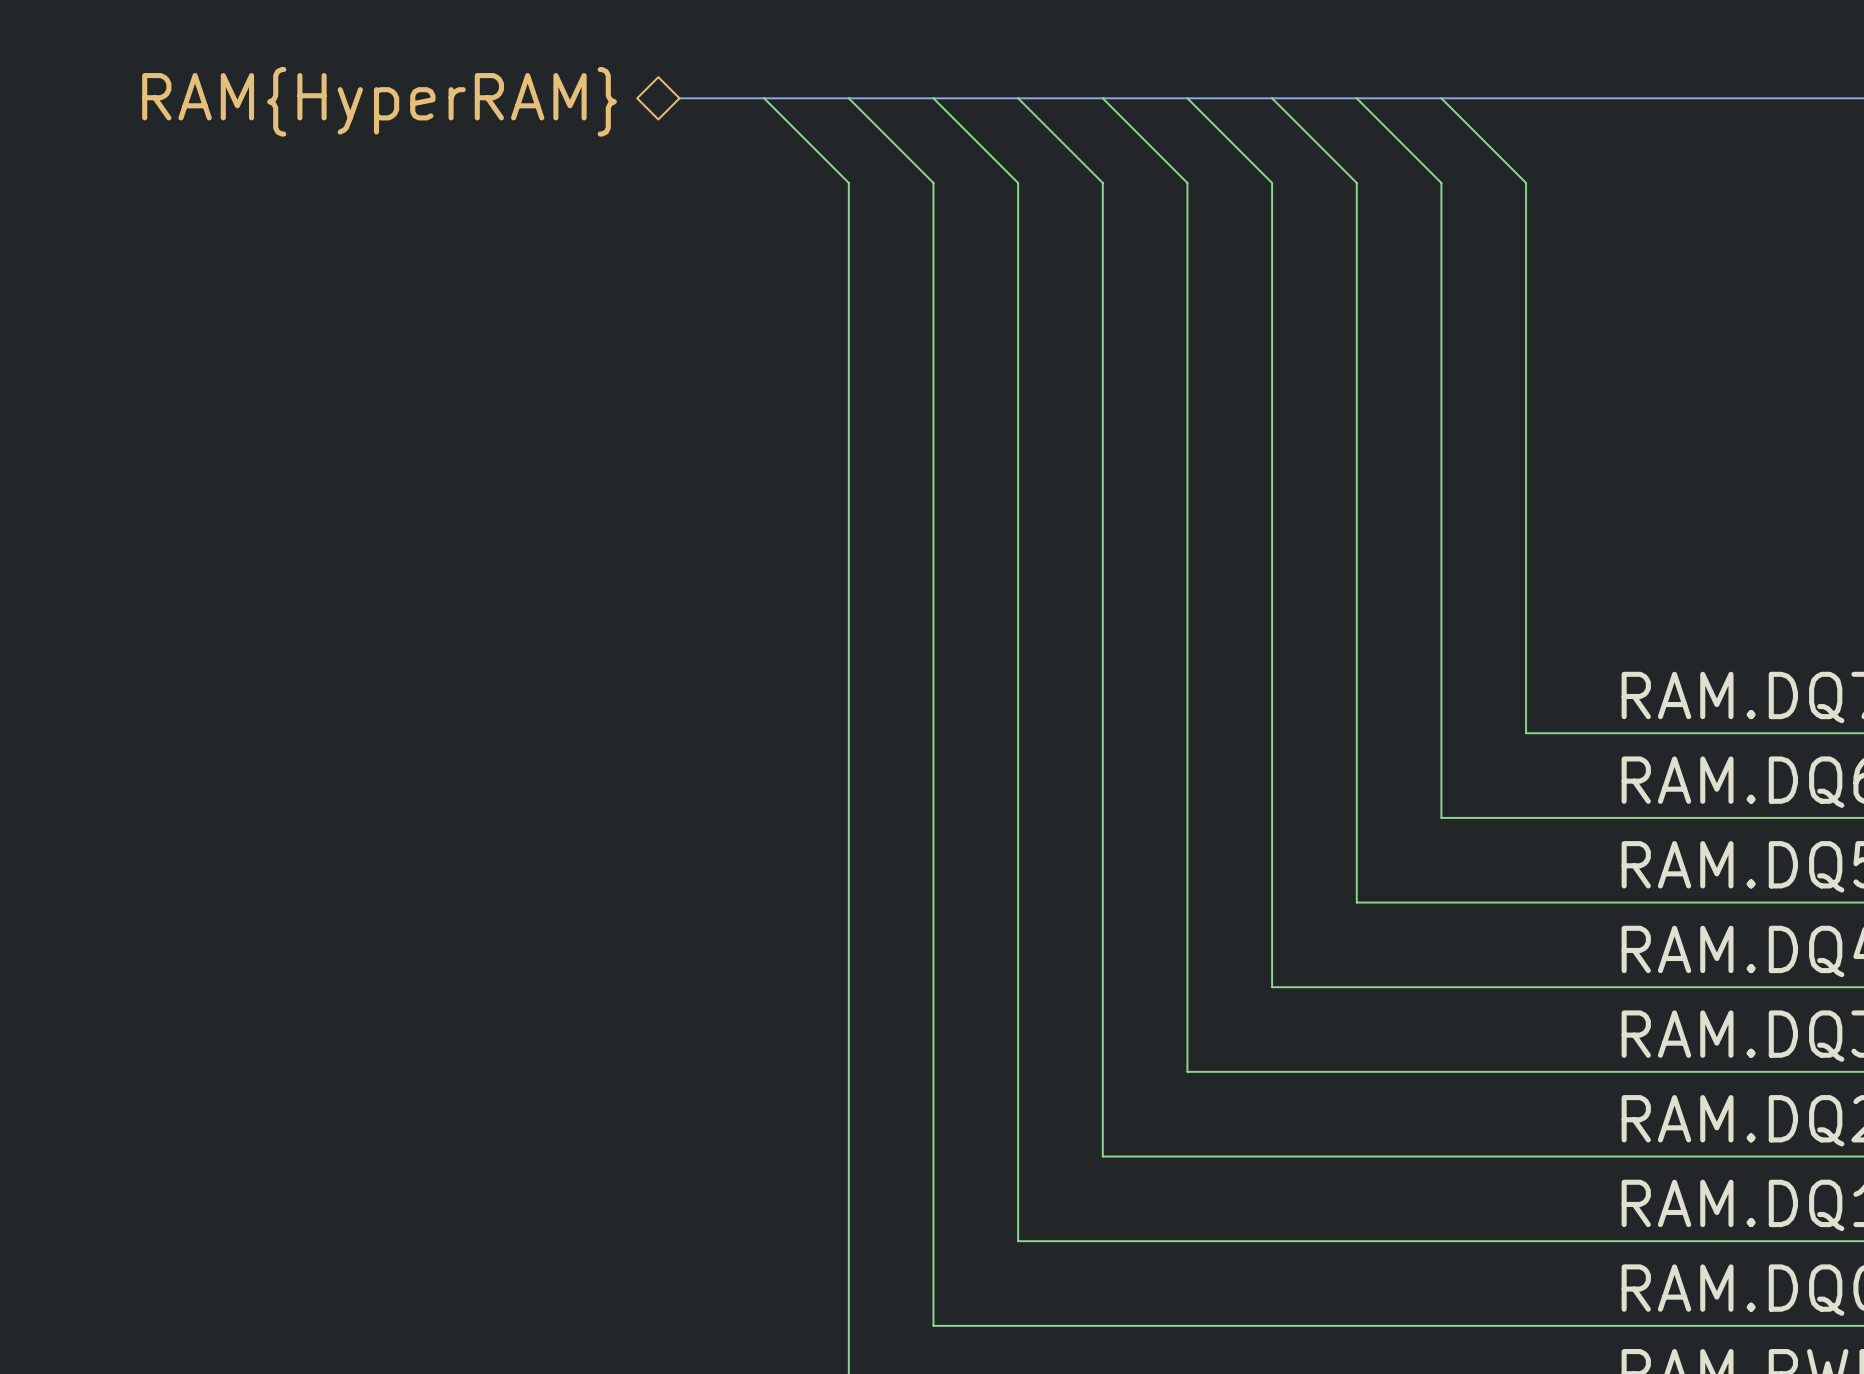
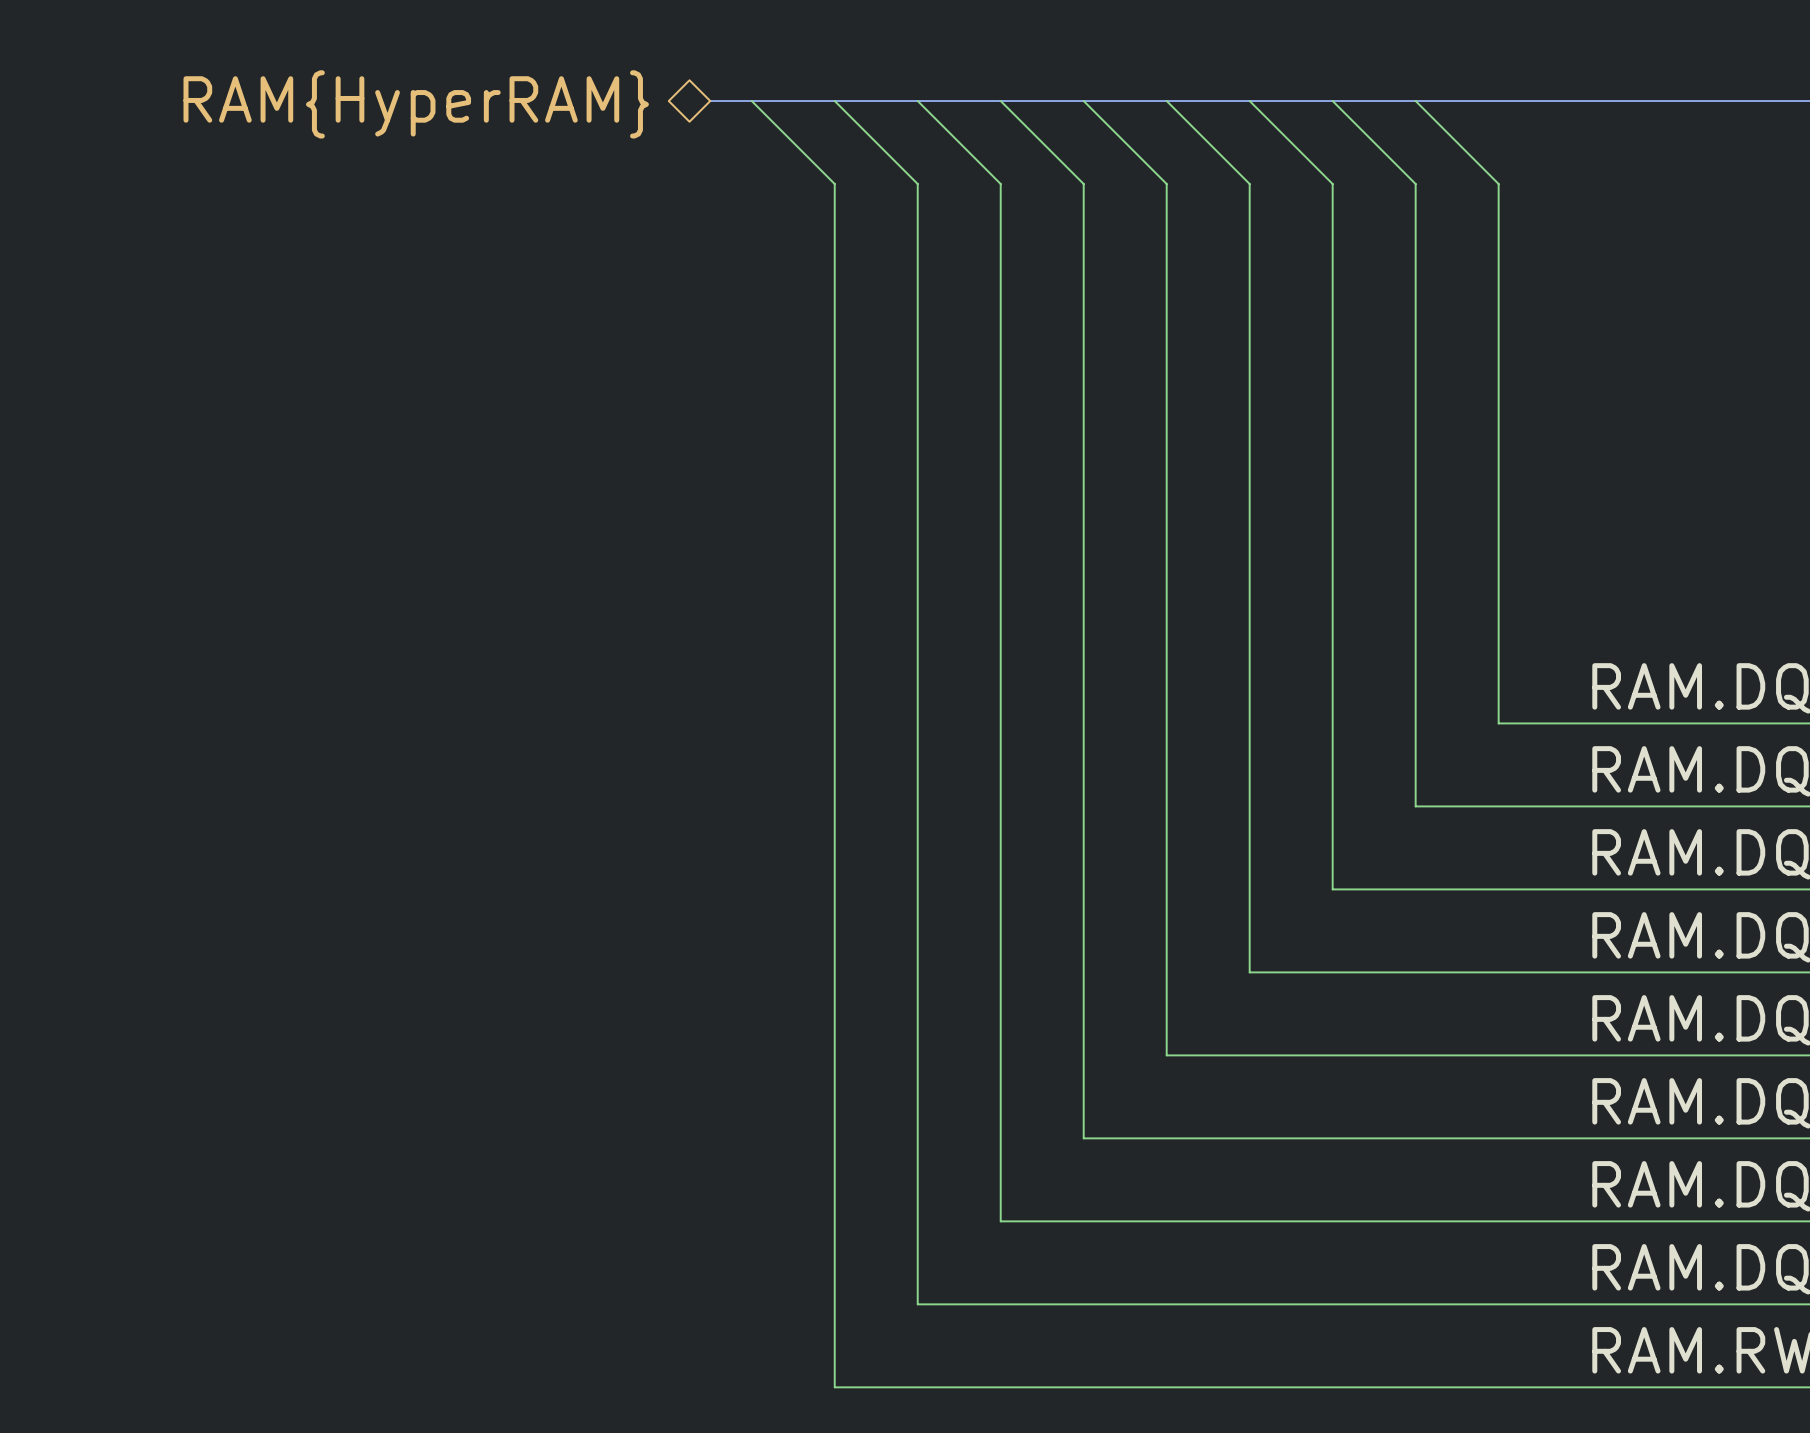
bus: (679, 98) (721, 98) -> none
hierarchical label position: RAM{HyperRAM} (379, 101) -> RAM{HyperRAM} (416, 104)

